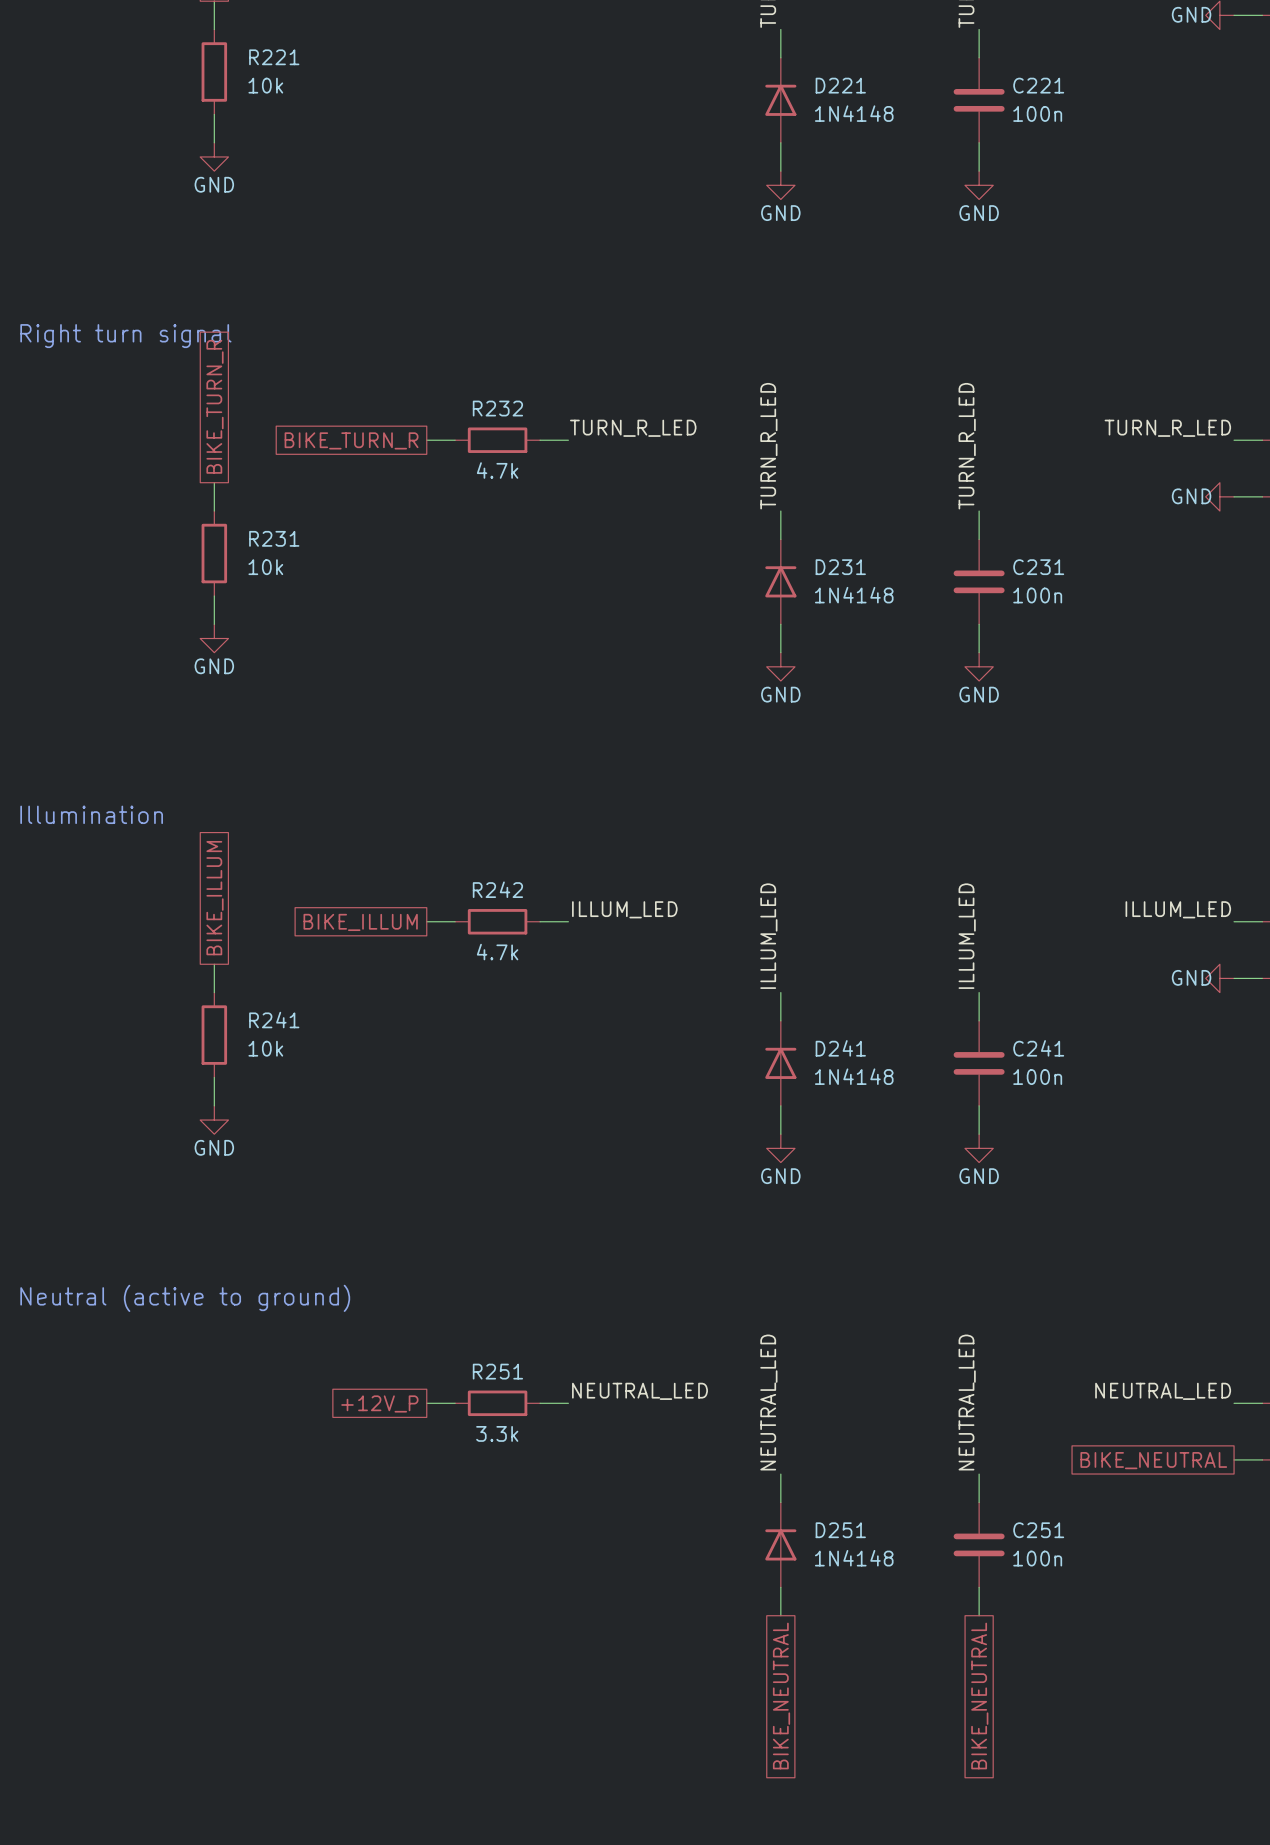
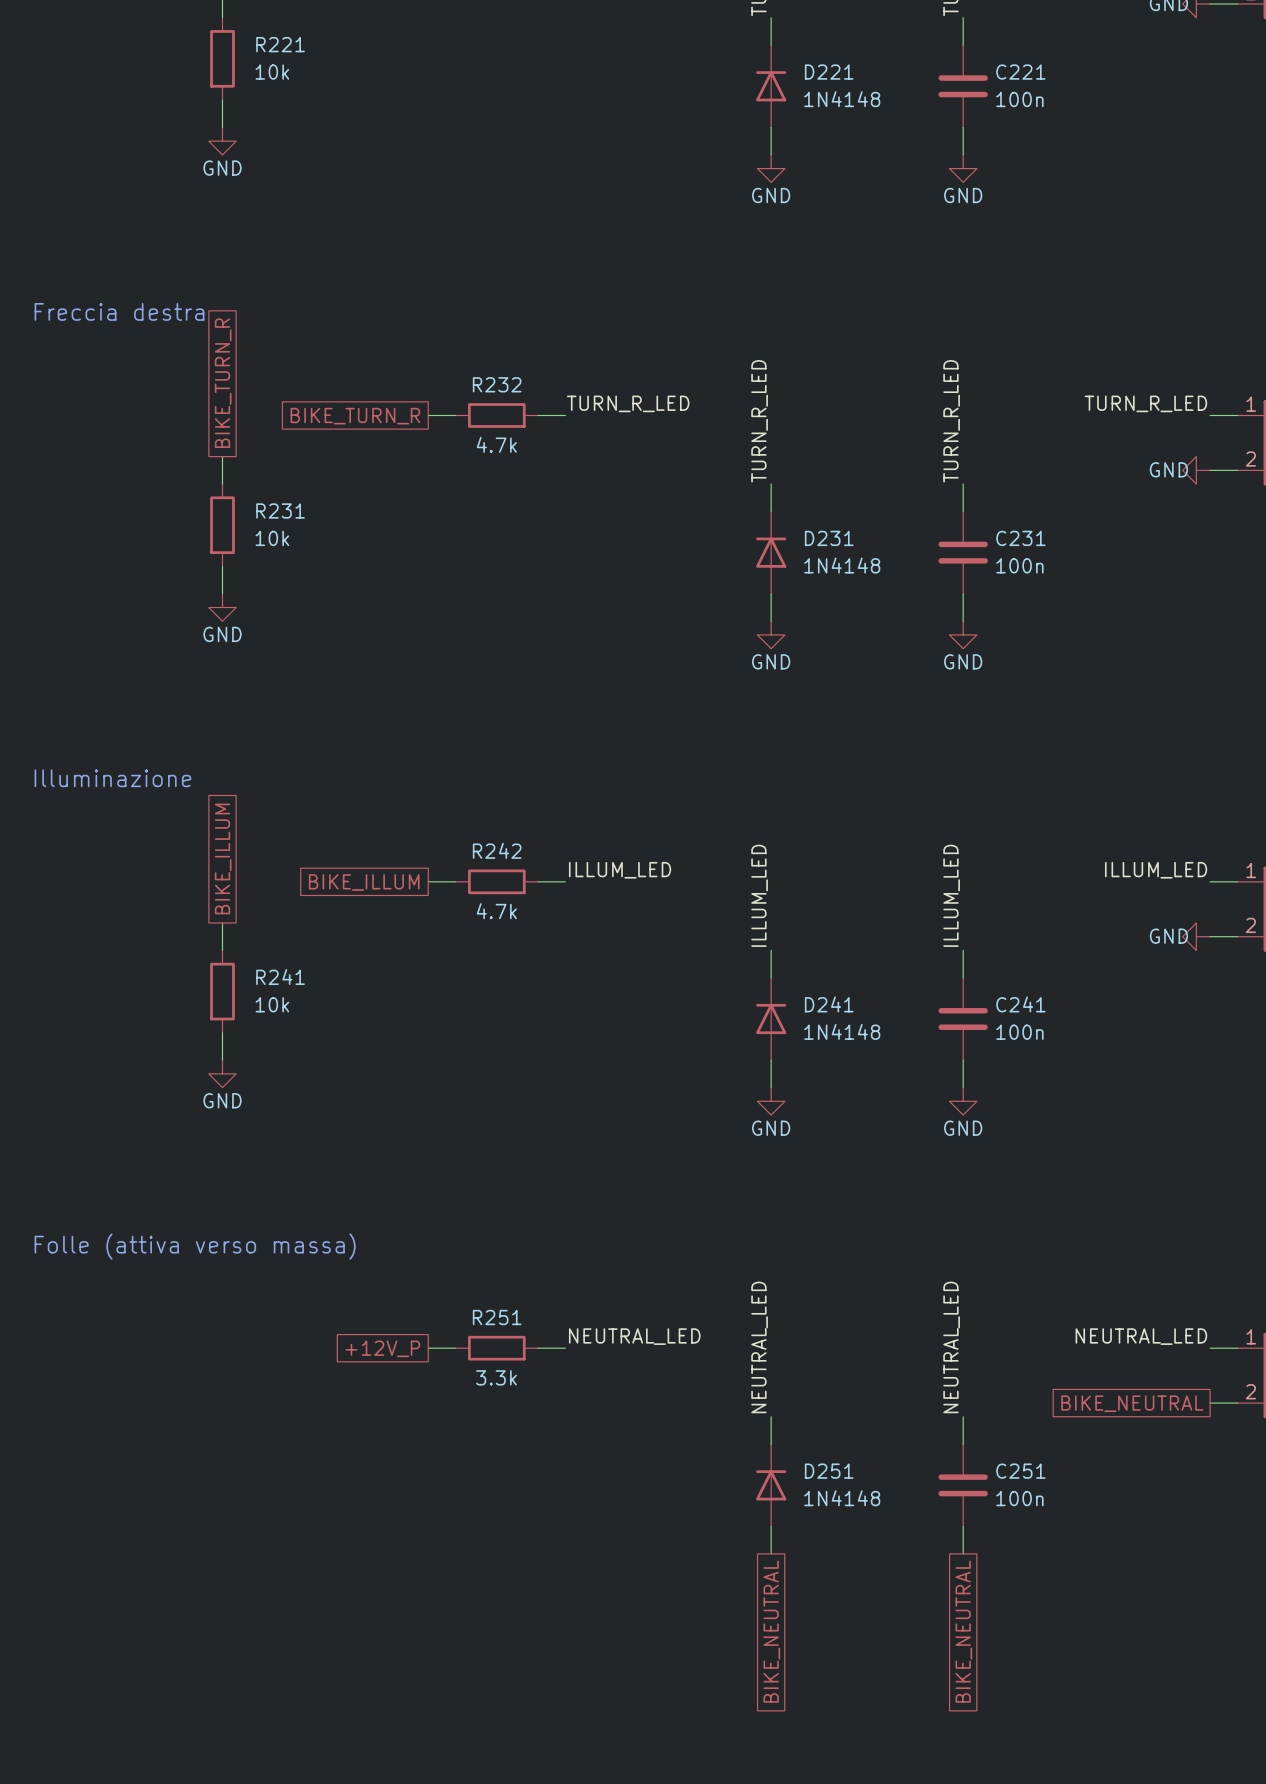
text: Right turn signal (125, 336) -> Freccia destra (119, 311)
text: Illumination (91, 814) -> Illuminazione (112, 778)
text: Neutral (active to ground) (185, 1298) -> Folle (attiva verso massa) (195, 1246)

